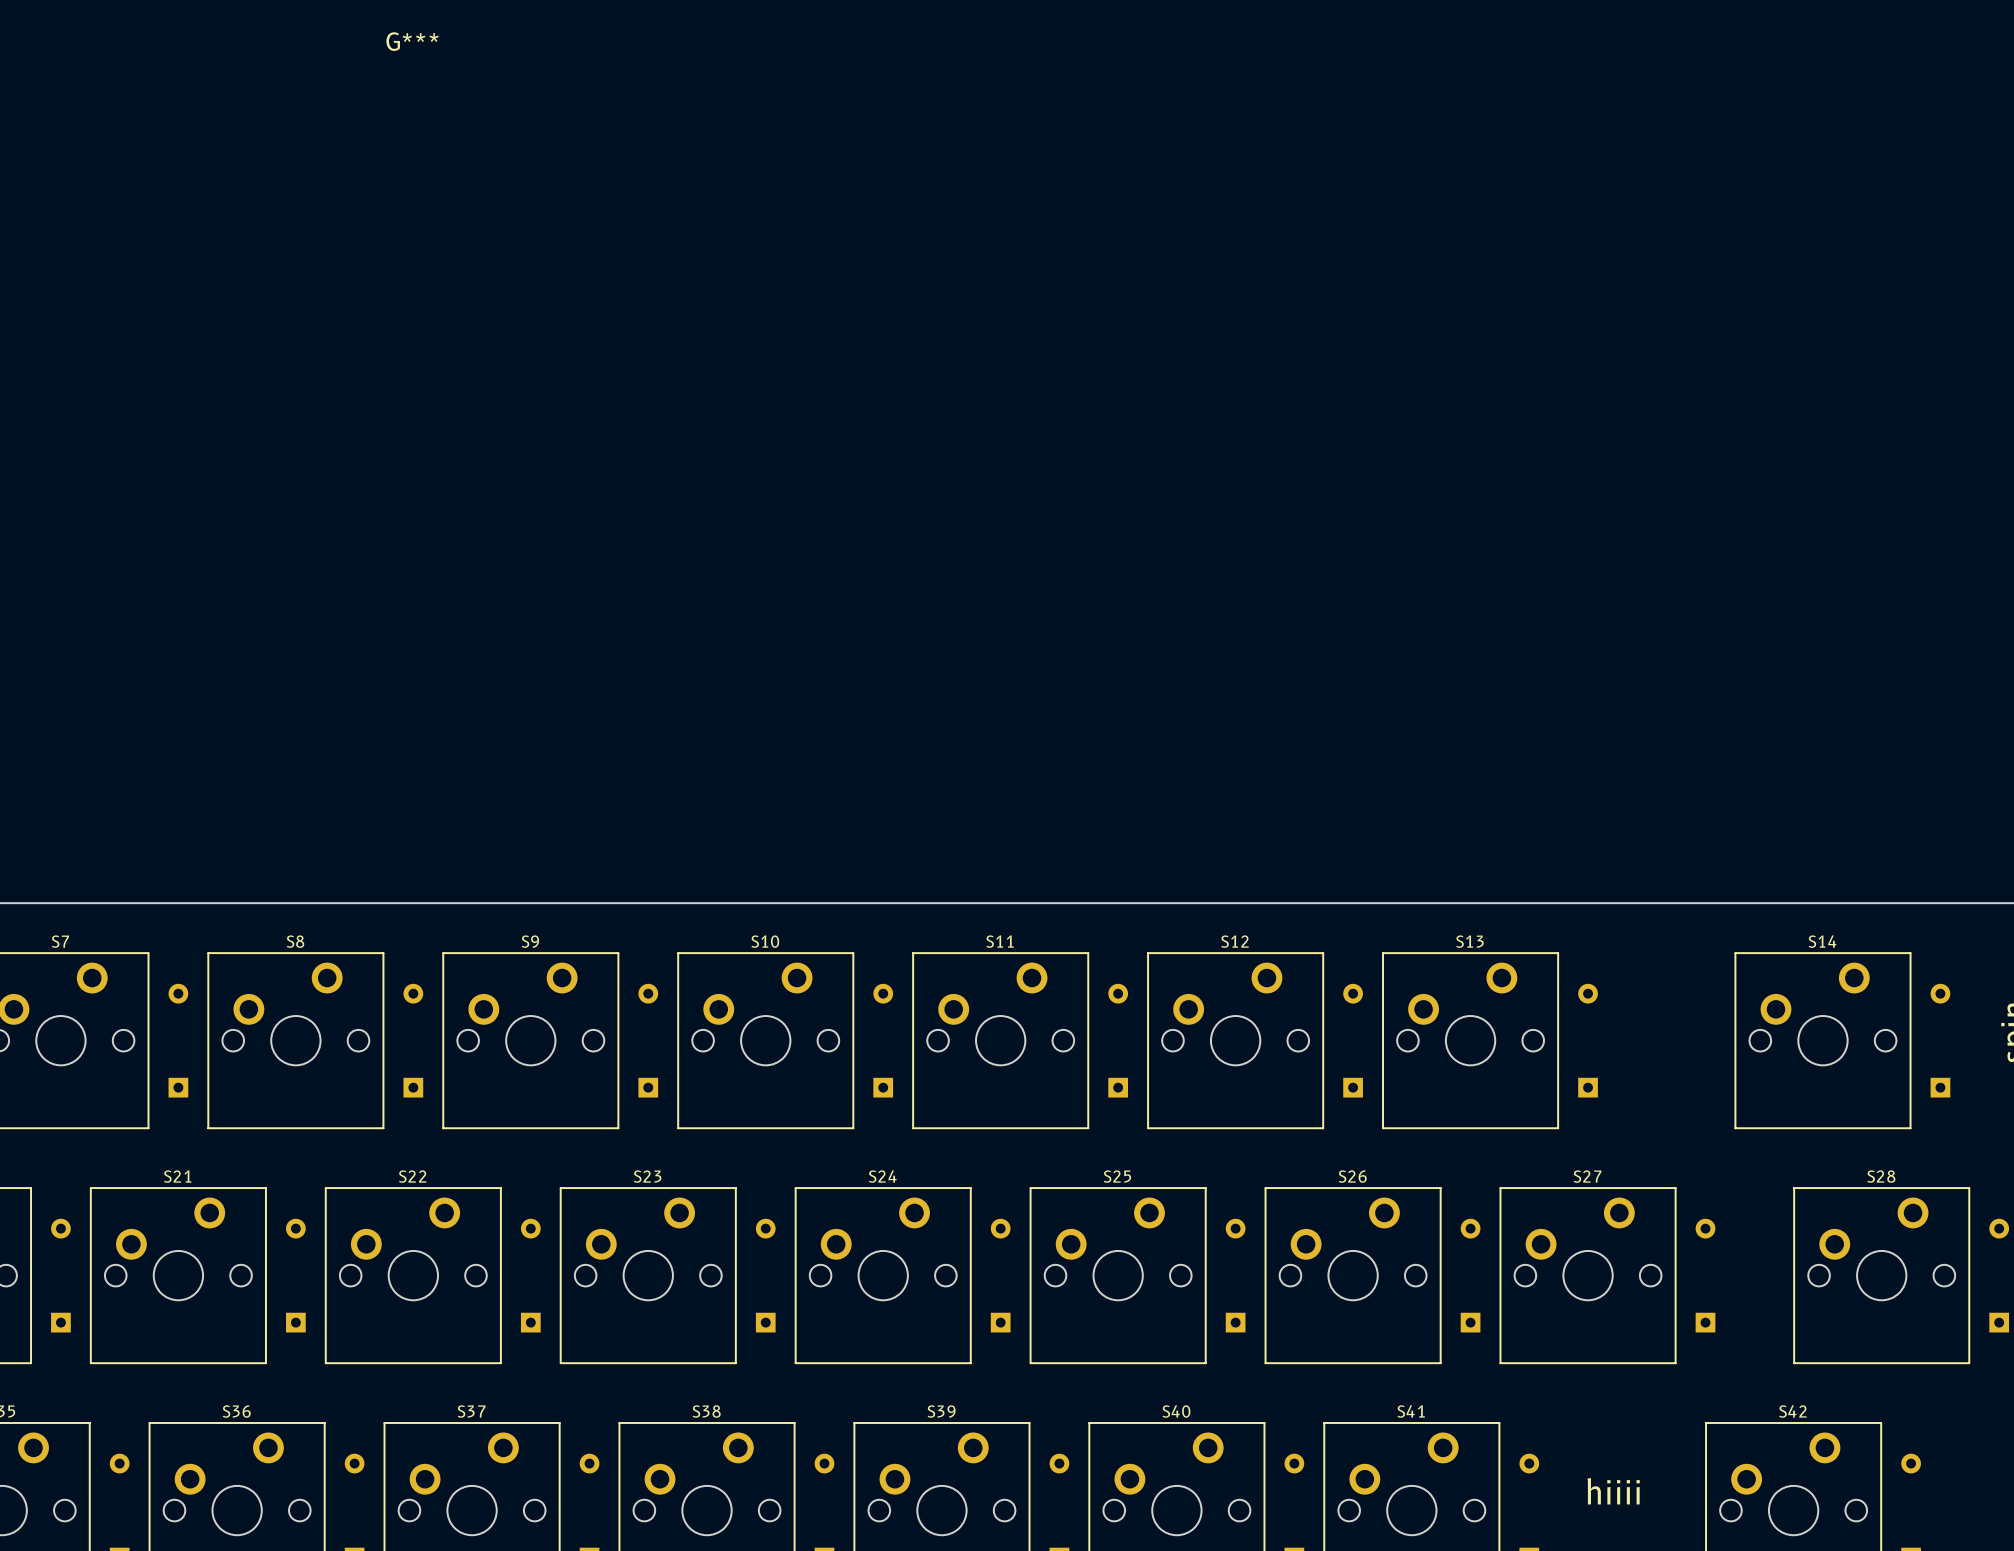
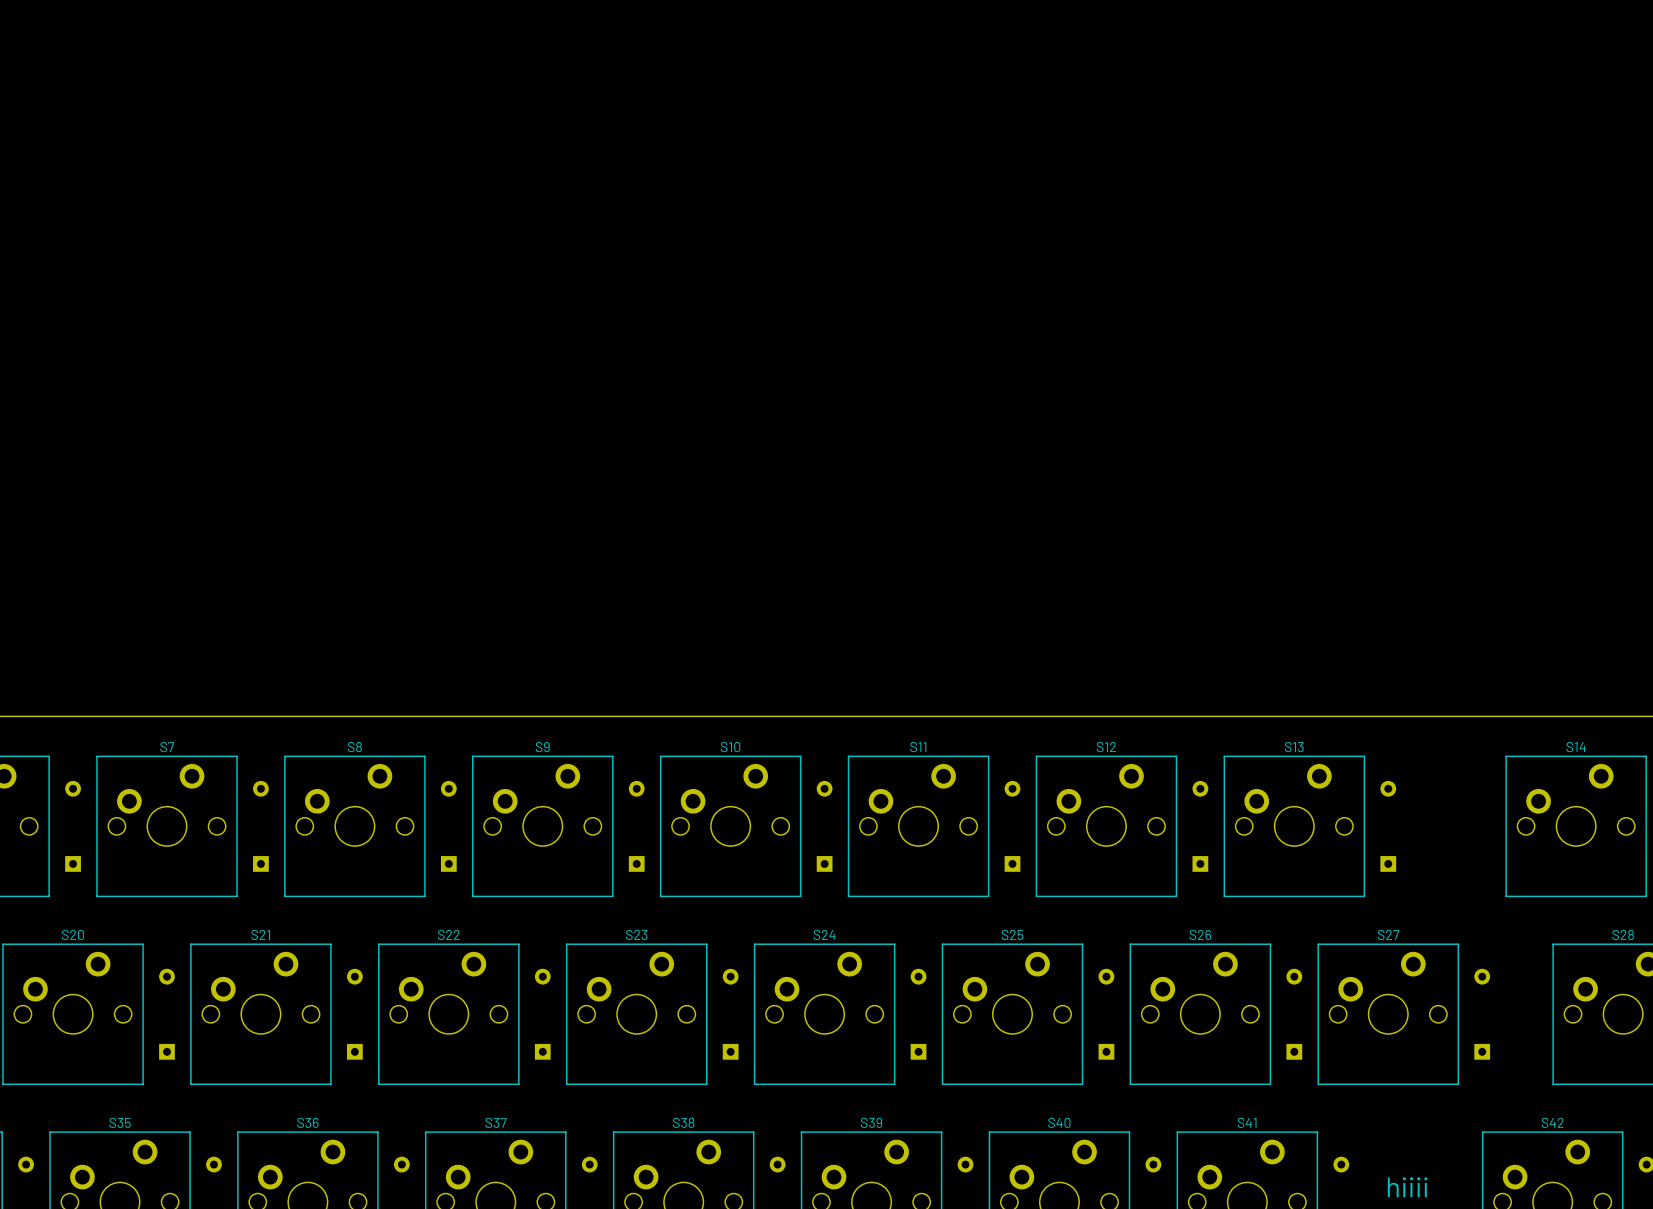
G***: (412, 41) -> none

